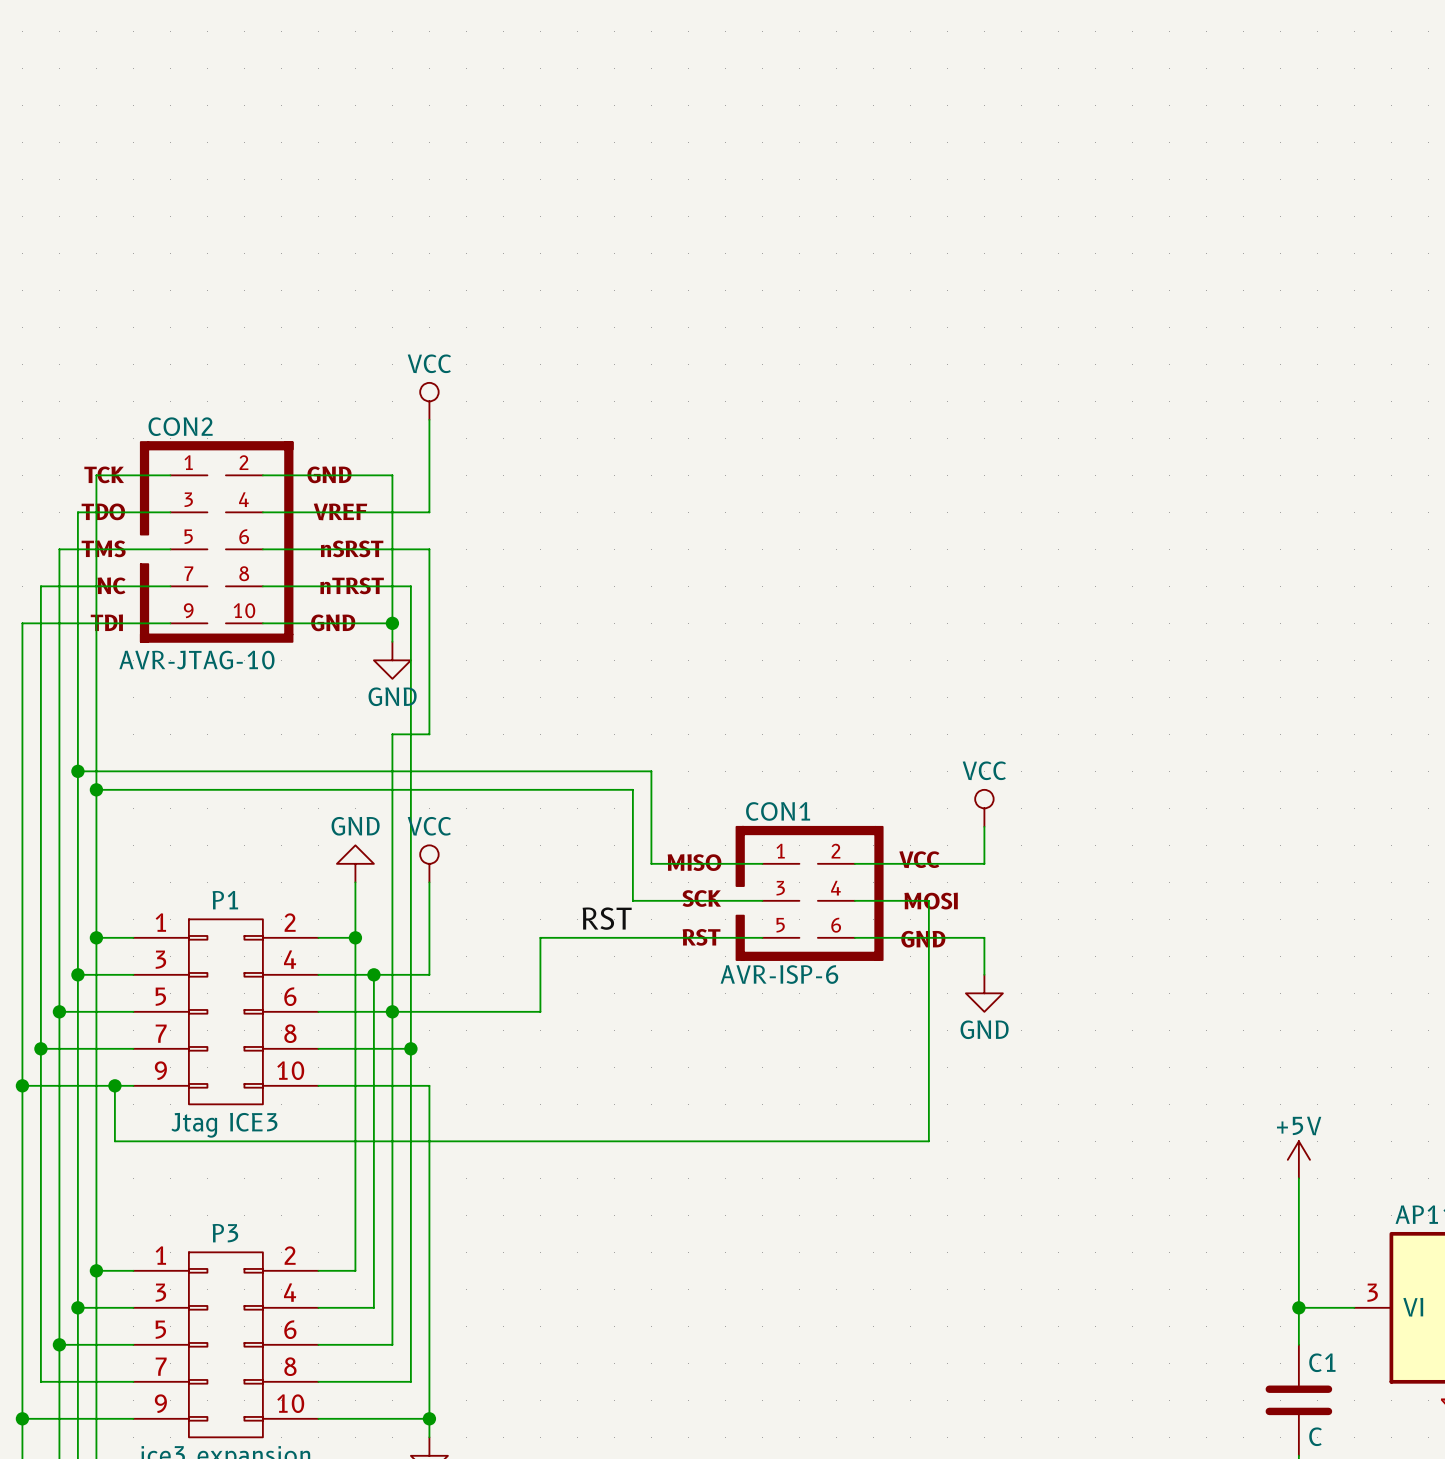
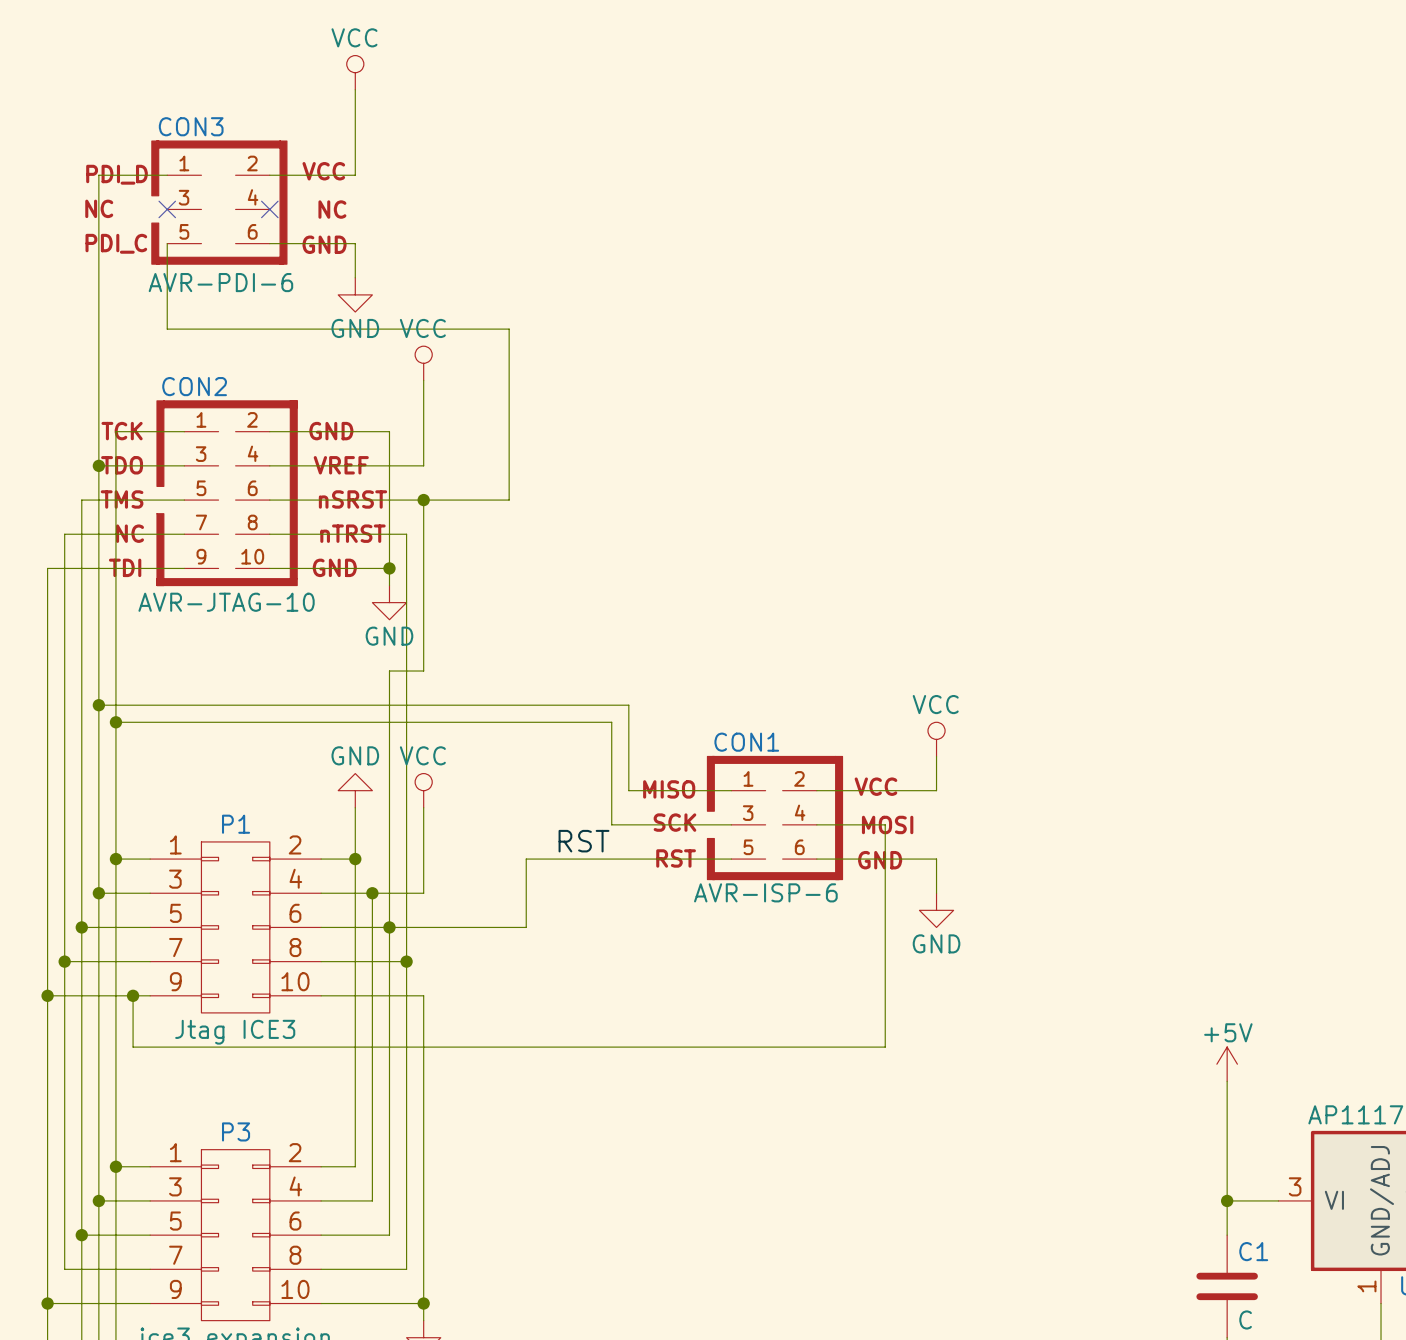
power symbol: none -> VCC (355, 72)
wire: none -> (355, 89) (355, 175) (269, 175)
wire: none -> (167, 175) (98, 175) (98, 465)
CON3: none -> AVR-PDI-6 (219, 202)
no-connect mark: none -> (167, 209)
no-connect mark: none -> (269, 209)
wire: none -> (167, 243) (167, 329) (509, 329) (509, 500) (423, 500)
wire: none -> (269, 243) (355, 243) (355, 277)
power symbol: none -> GND (355, 294)
junction: none -> (98, 465)
junction: none -> (423, 500)

